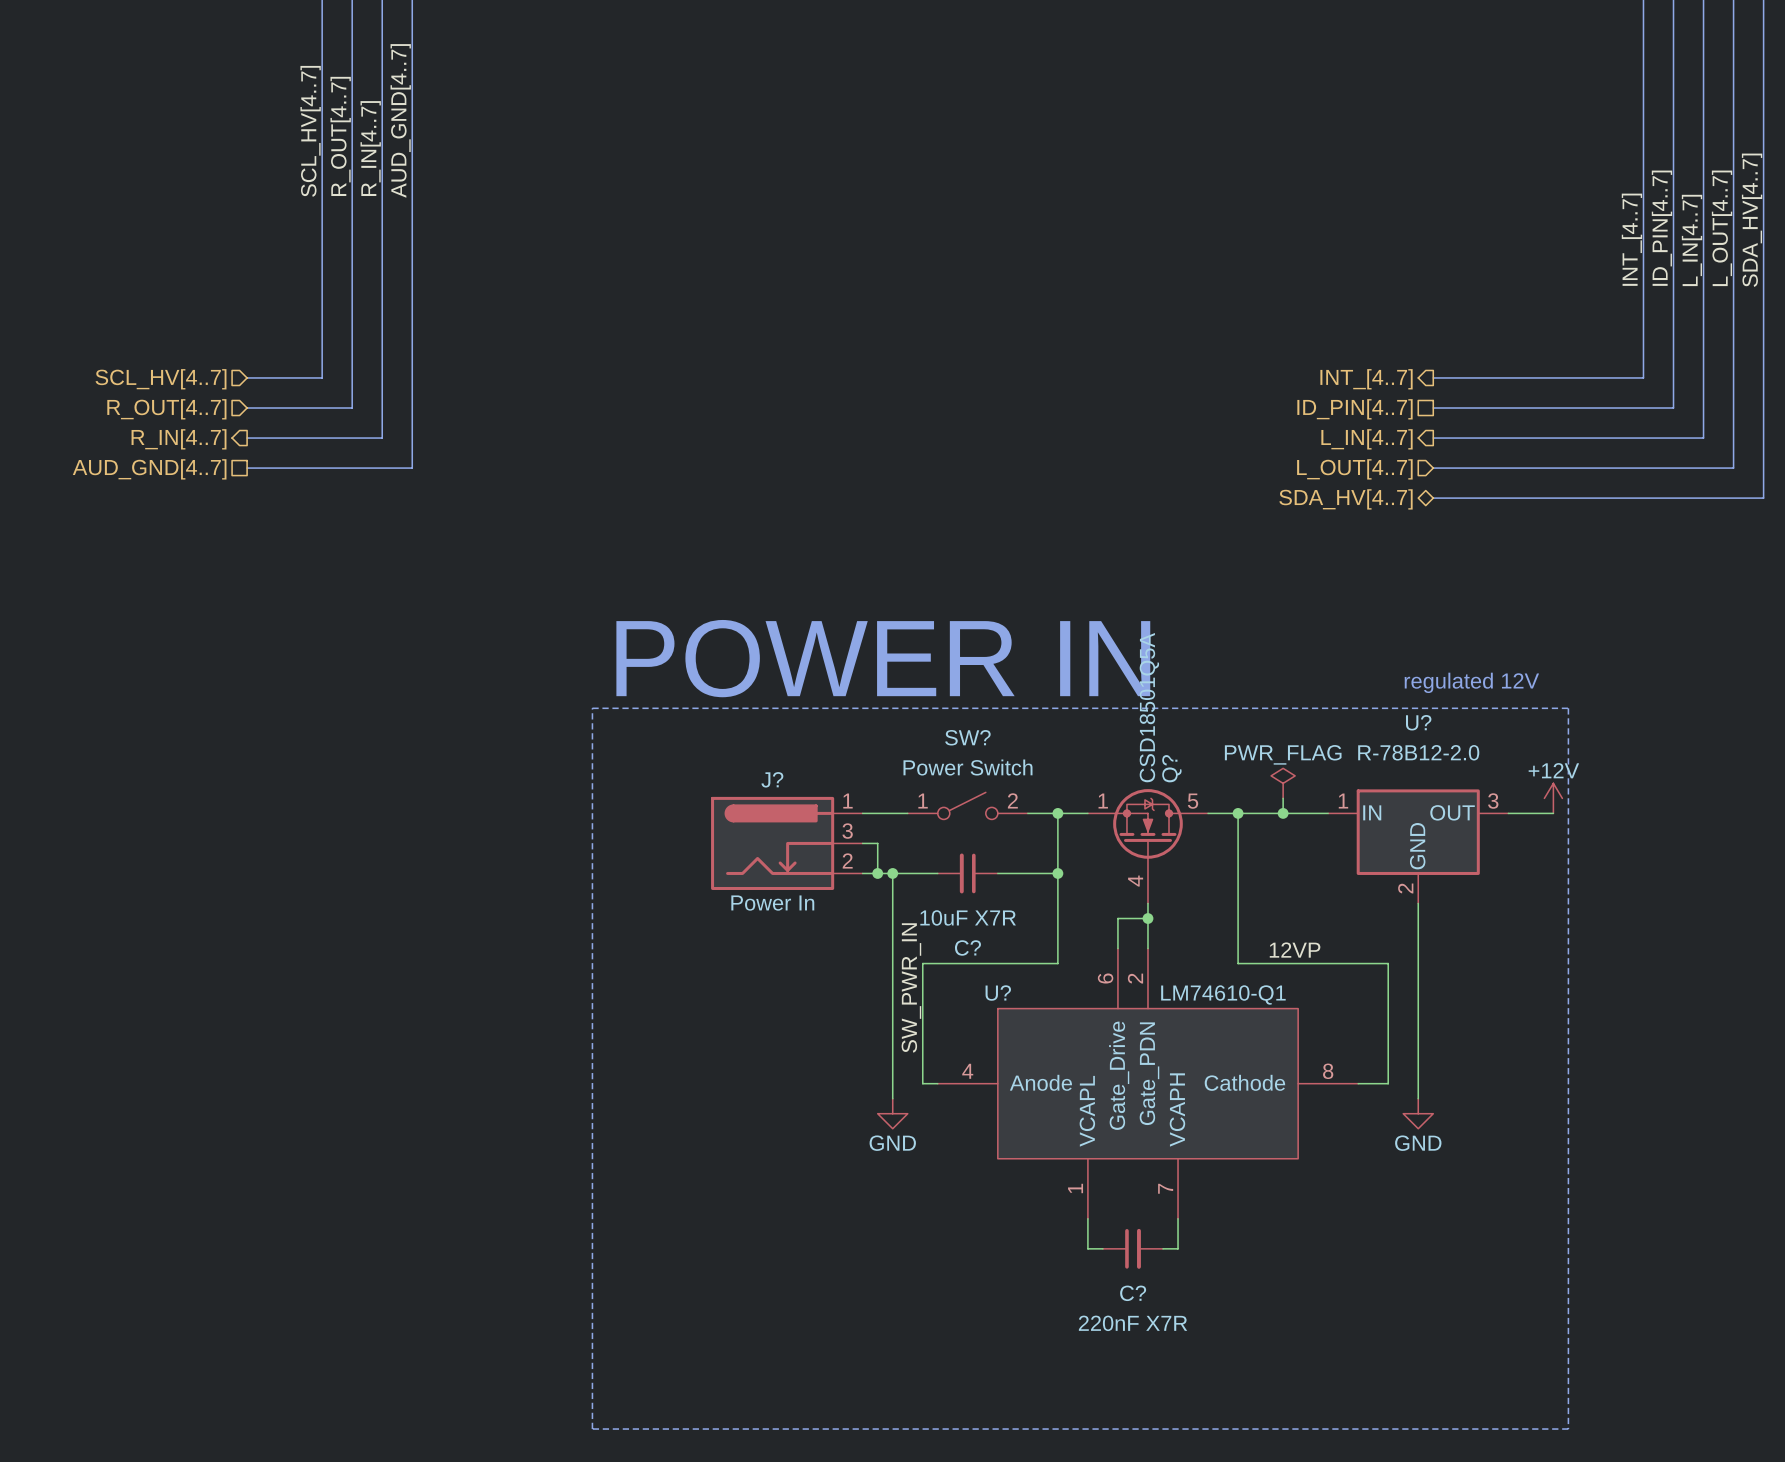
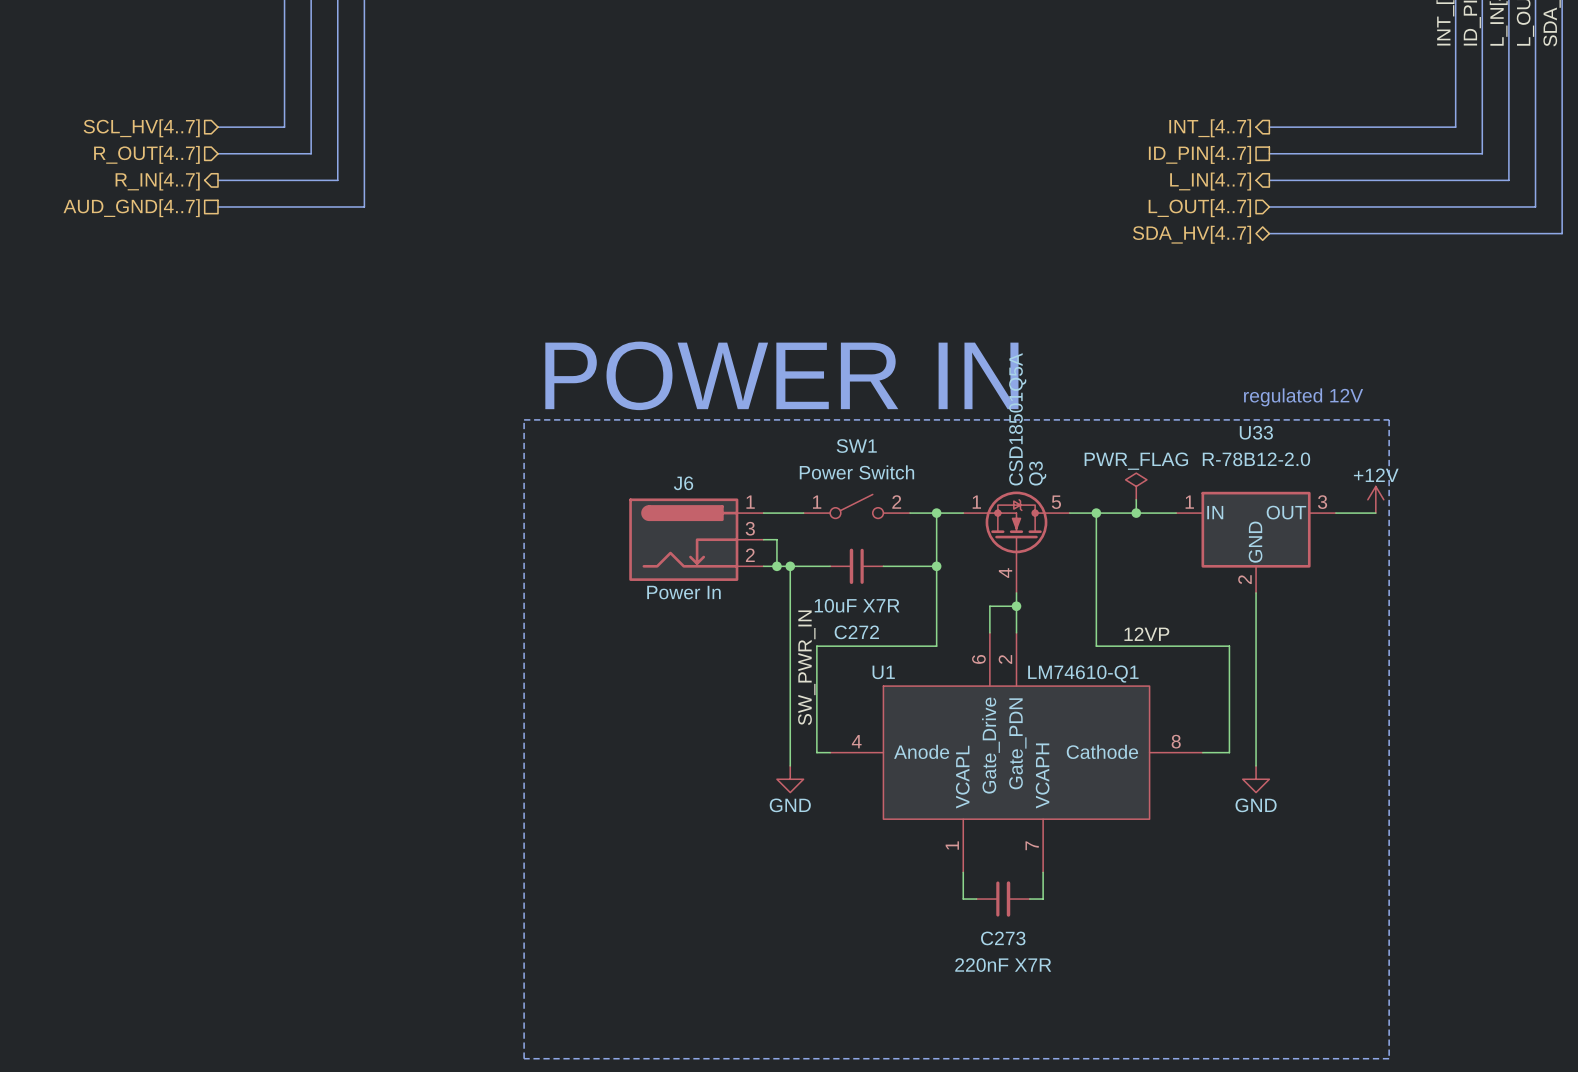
U? name: U? (1418, 722) -> U33 (1256, 432)
SW? name: SW? (967, 737) -> SW1 (856, 446)
Q? name: Q? (1171, 768) -> Q3 (1037, 473)
J? name: J? (772, 779) -> J6 (683, 483)
C? name: C? (967, 947) -> C272 (856, 632)
U? name: U? (998, 993) -> U1 (883, 672)
C? name: C? (1133, 1293) -> C273 (1003, 938)

